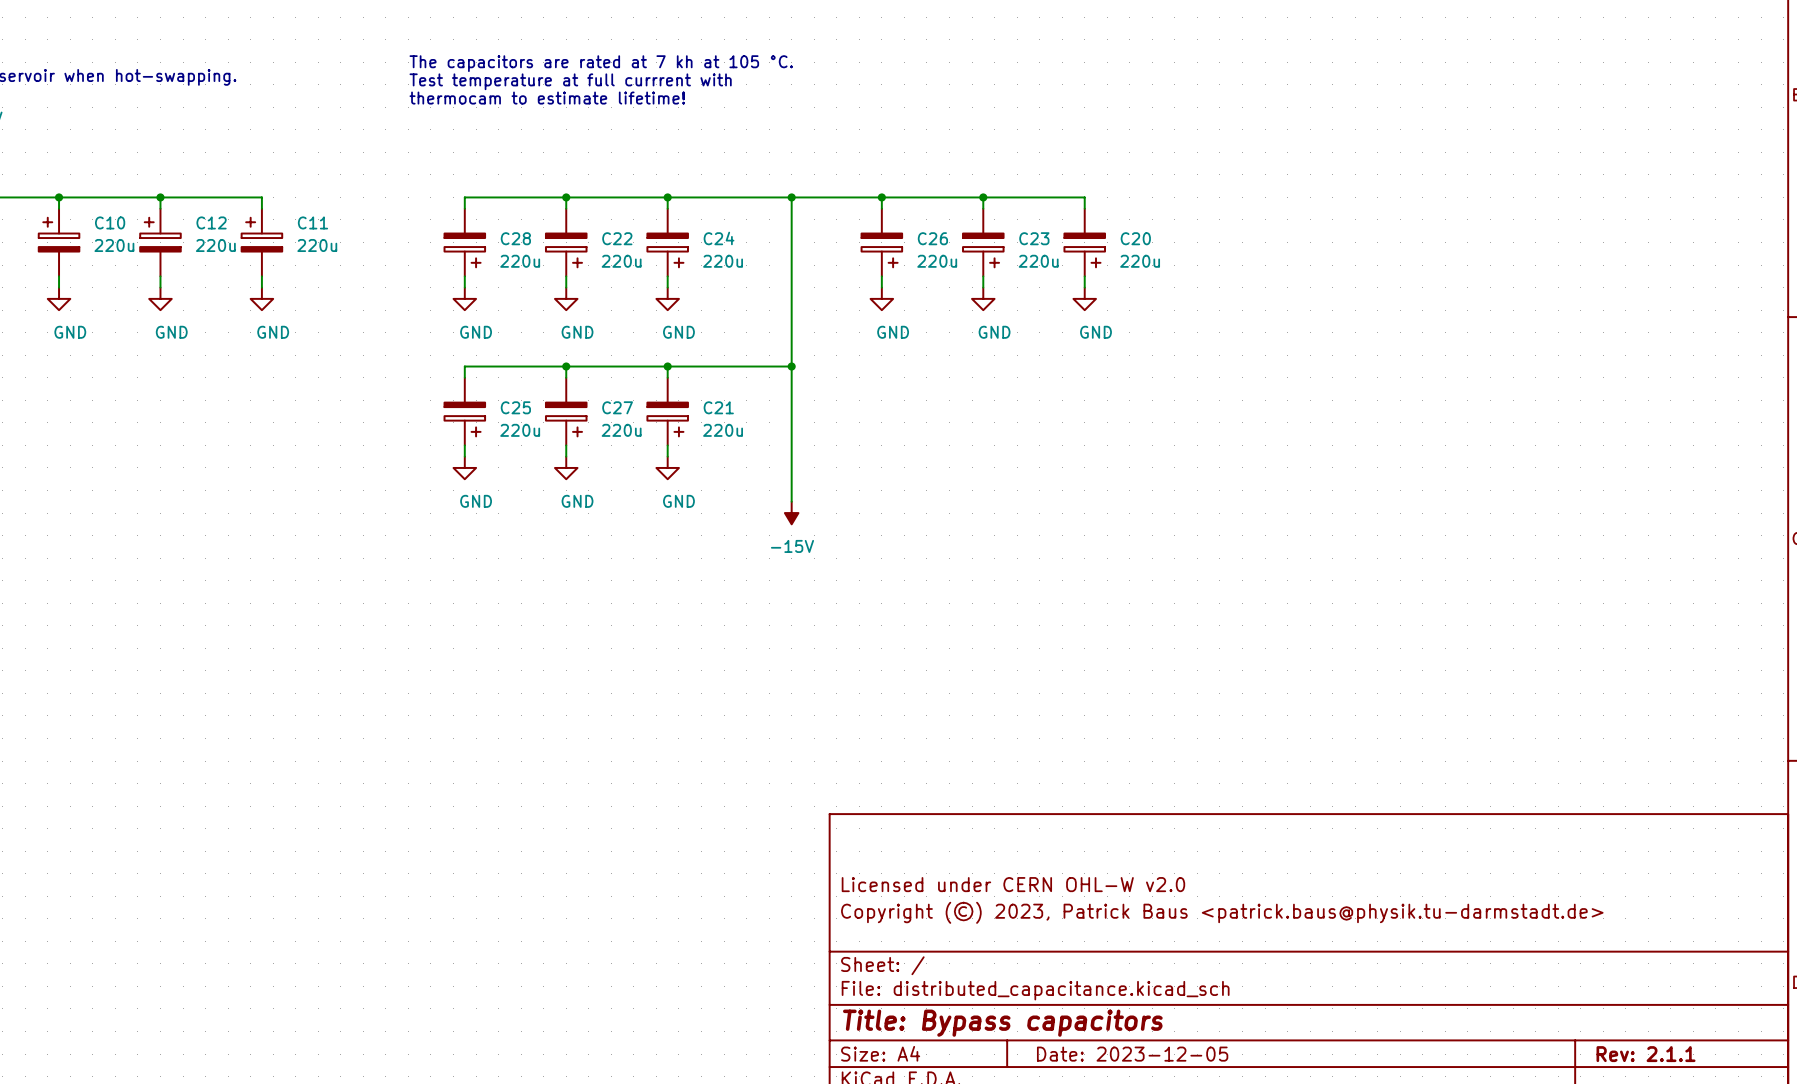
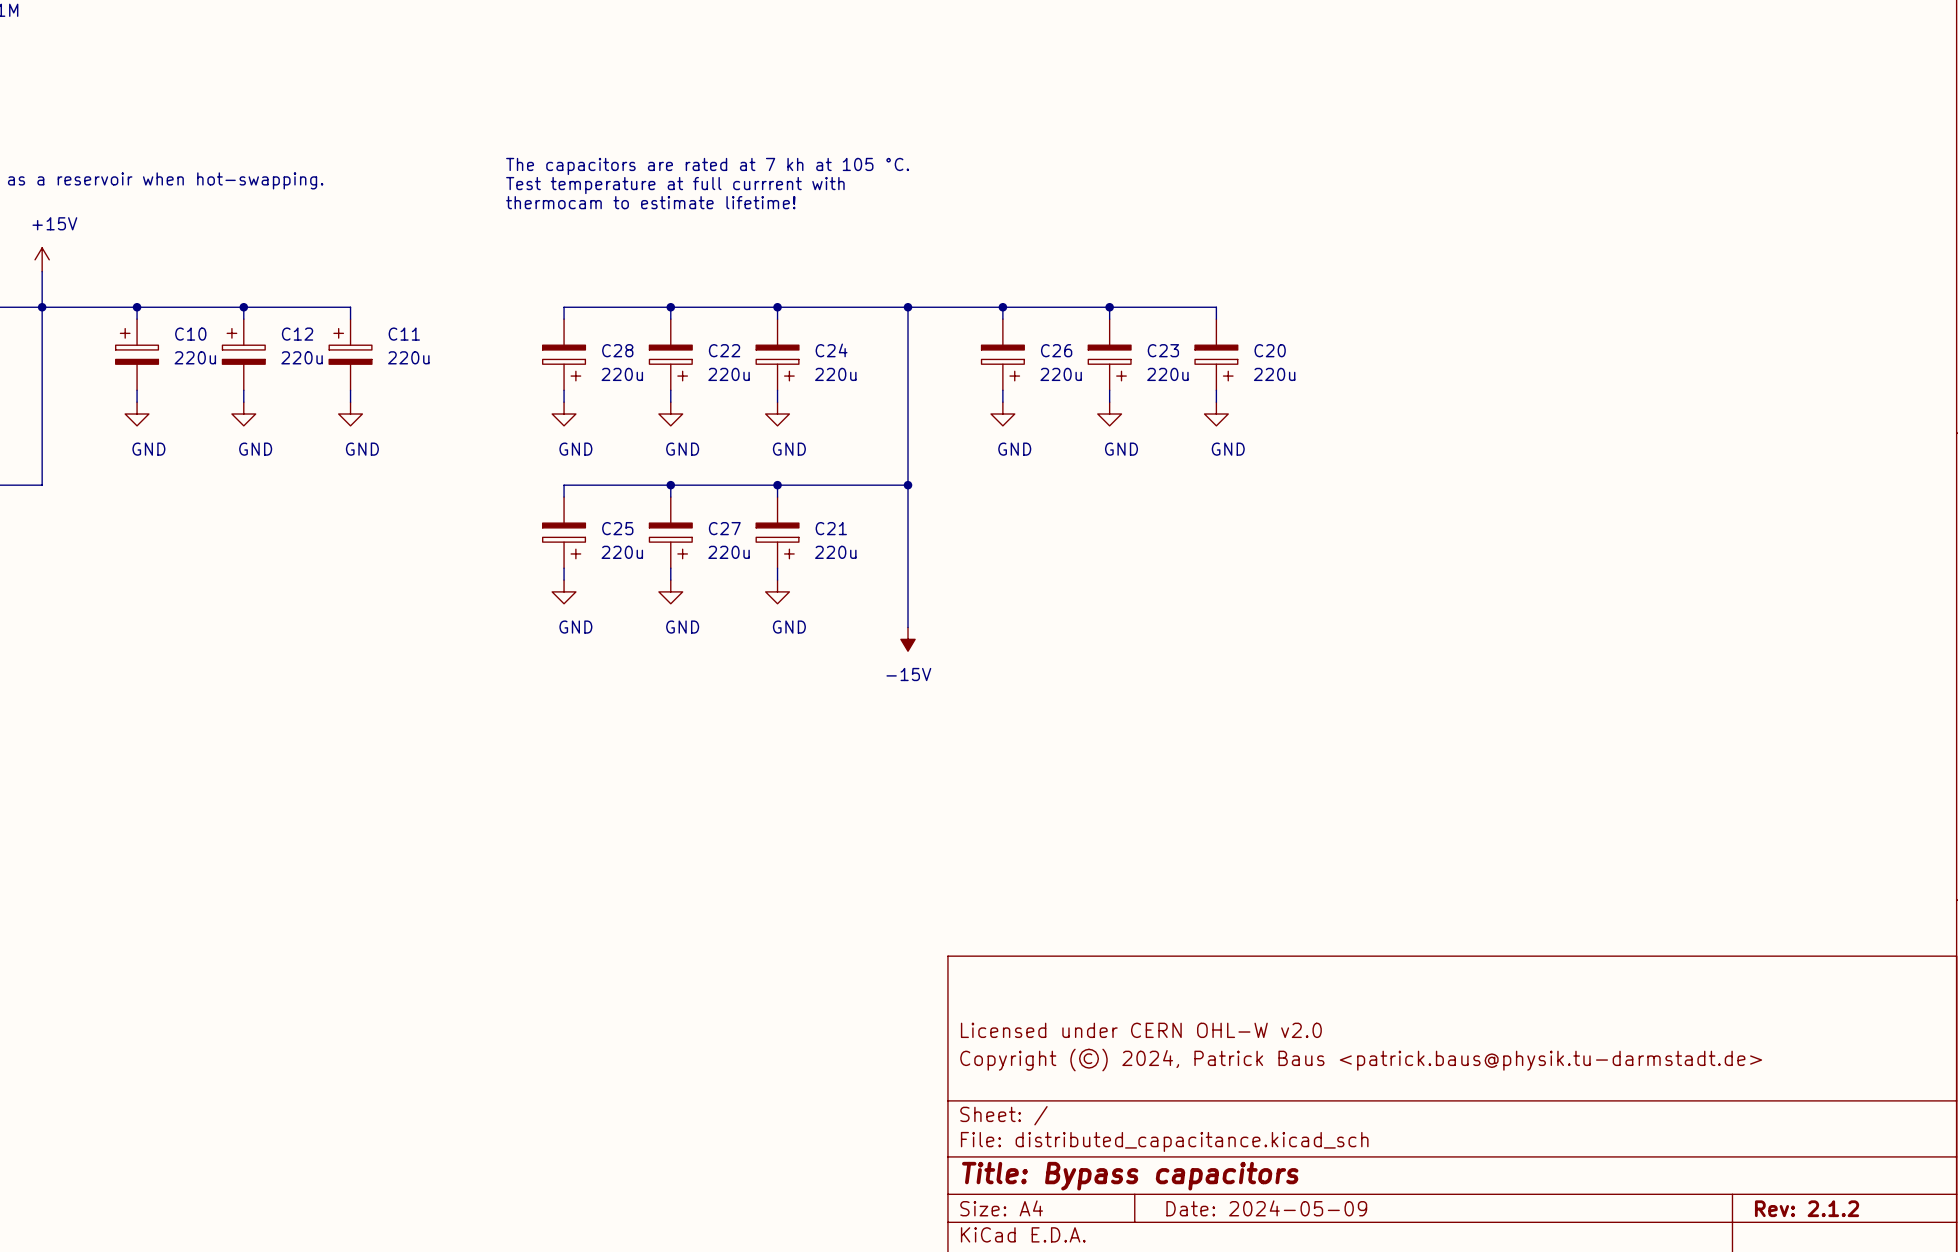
title block: Copyright (©) 2023, Patrick Baus <patrick.baus@physik.tu-darmstadt.de> (1222, 912) -> Copyright (©) 2024, Patrick Baus <patrick.baus@physik.tu-darmstadt.de> (1361, 1060)
title block: Date: 2023-12-05 (1132, 1054) -> Date: 2024-05-09 (1266, 1208)
title block: Rev: 2.1.1 (1646, 1054) -> Rev: 2.1.2 (1807, 1208)

